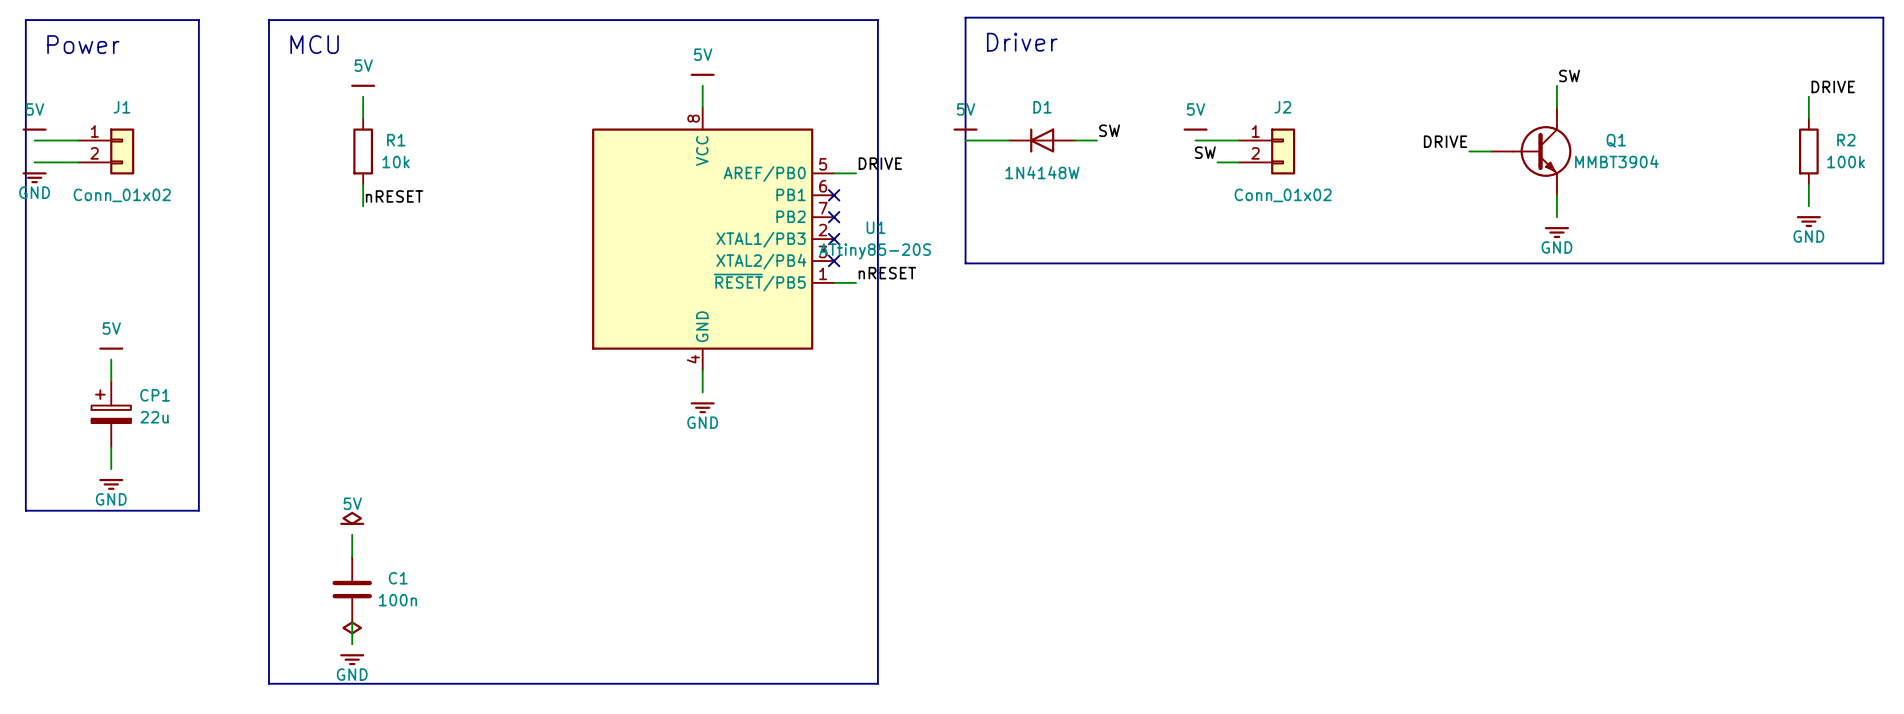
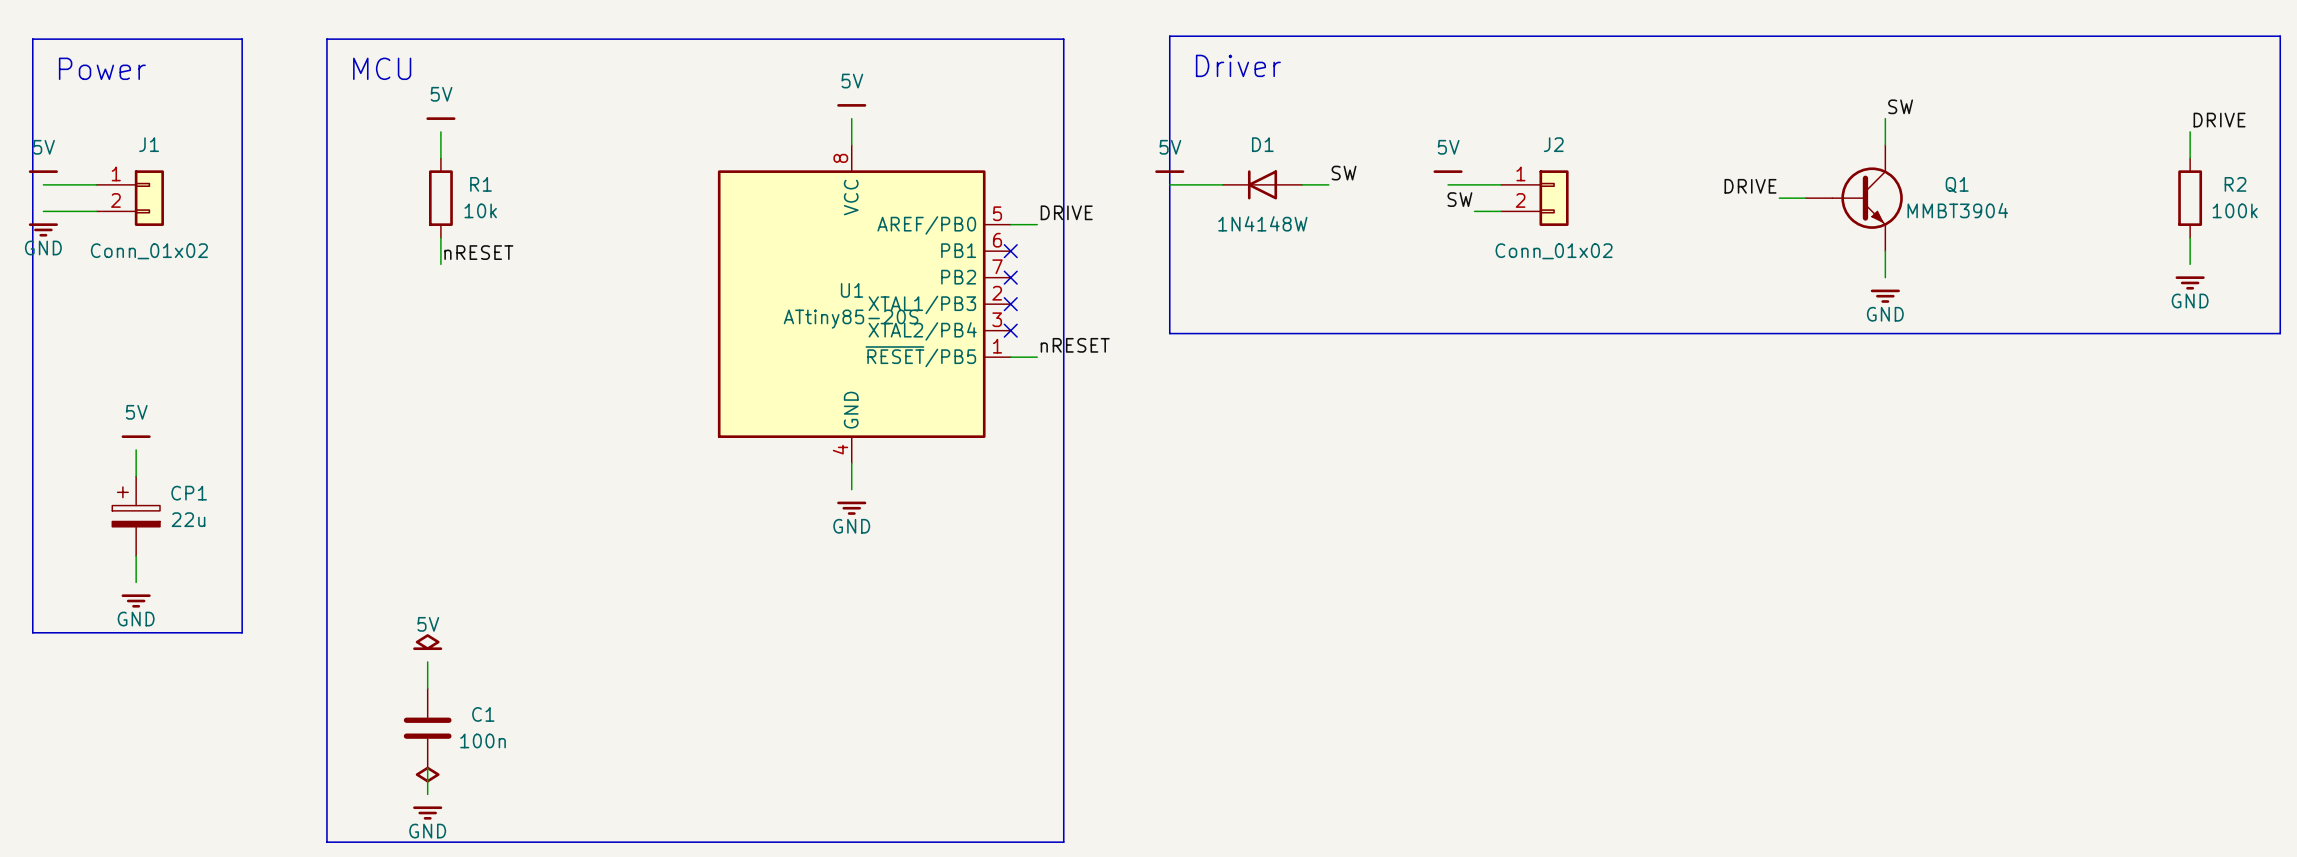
U1 name position: U1 (875, 227) -> U1 (852, 290)
U1 value position: ATtiny85-20S (875, 251) -> ATtiny85-20S (851, 319)

